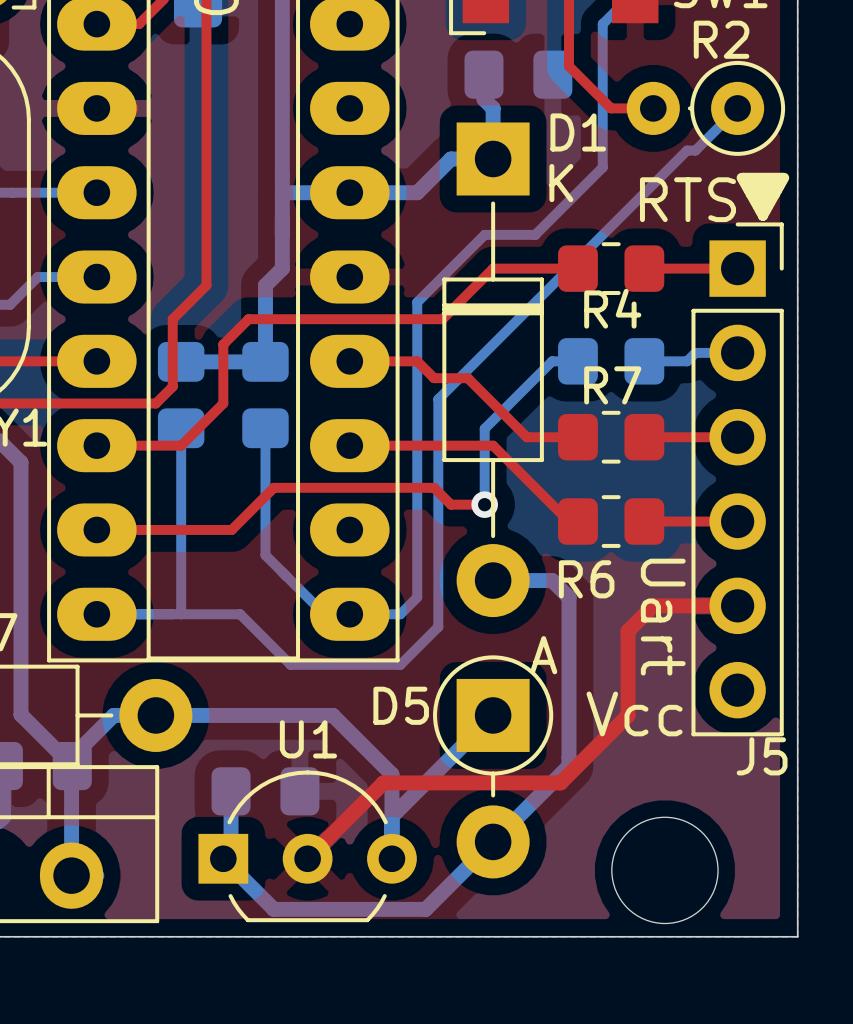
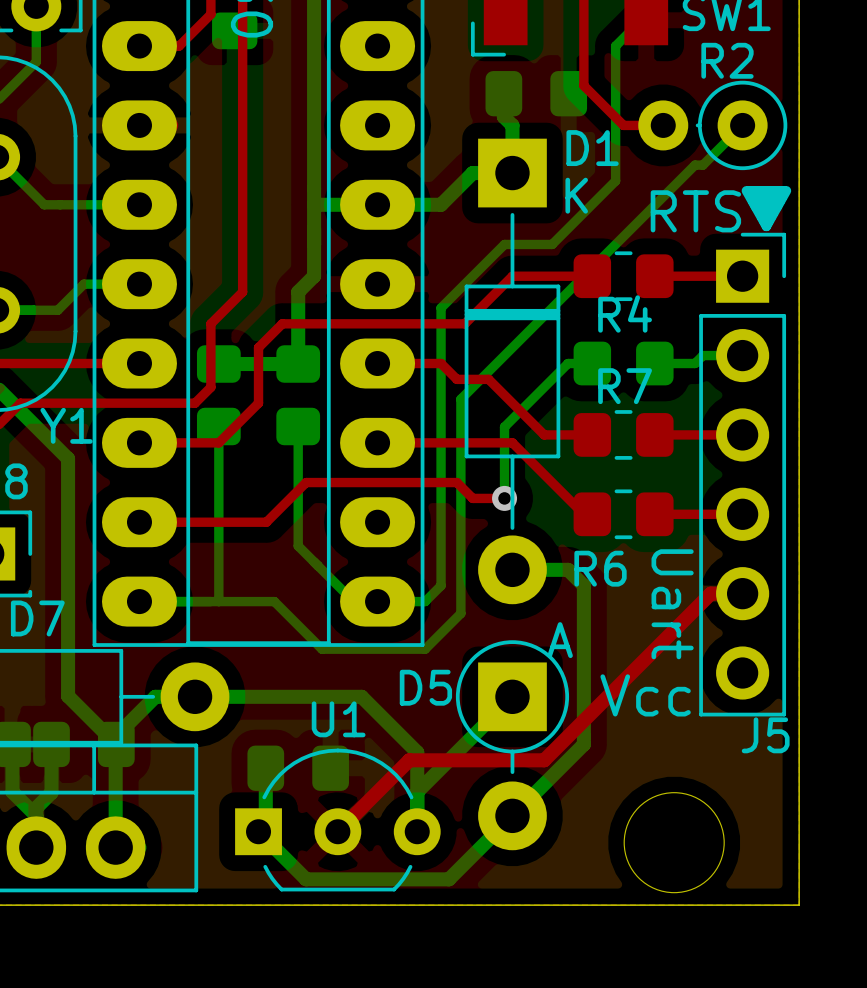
top track: (703, 605) (653, 605) (628, 631) (628, 715) (560, 782) (526, 782) -> (710, 593) (544, 760)

